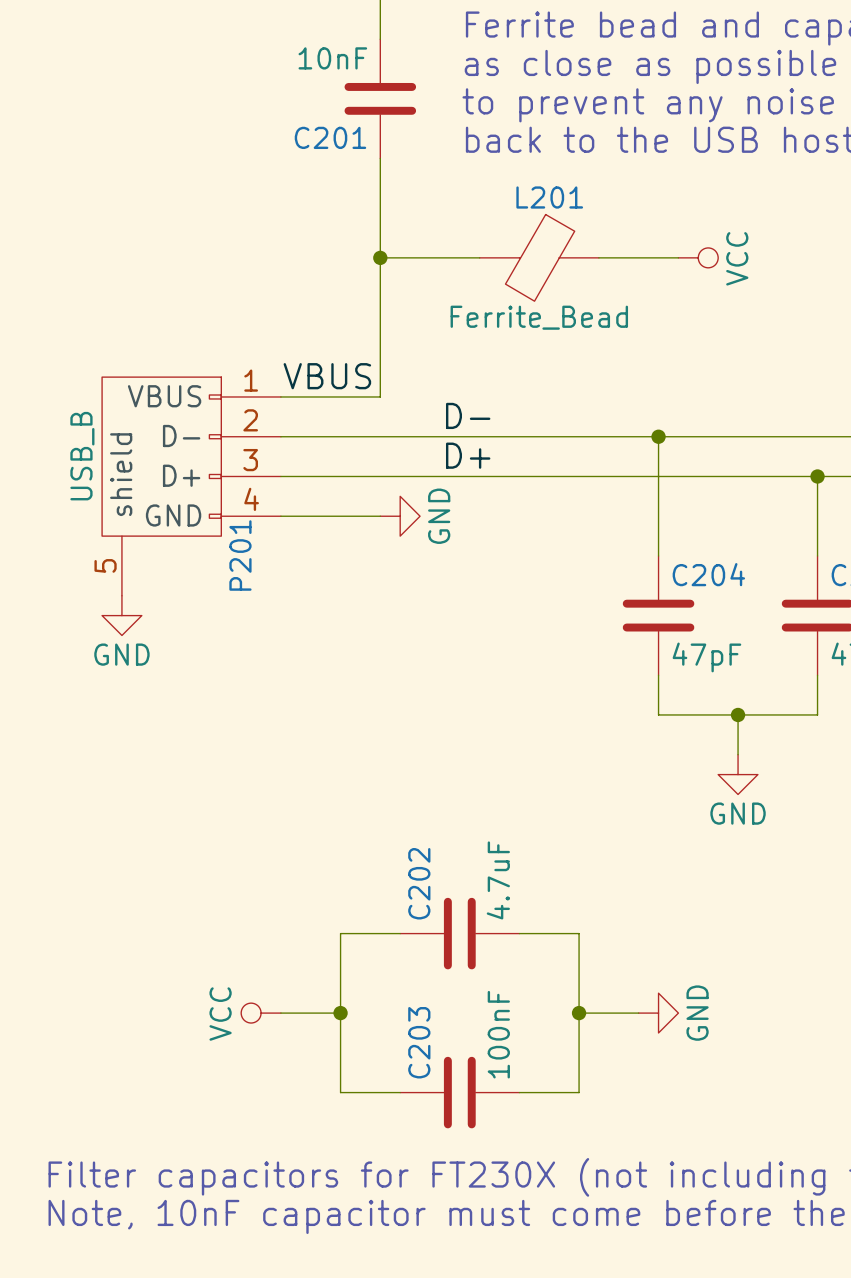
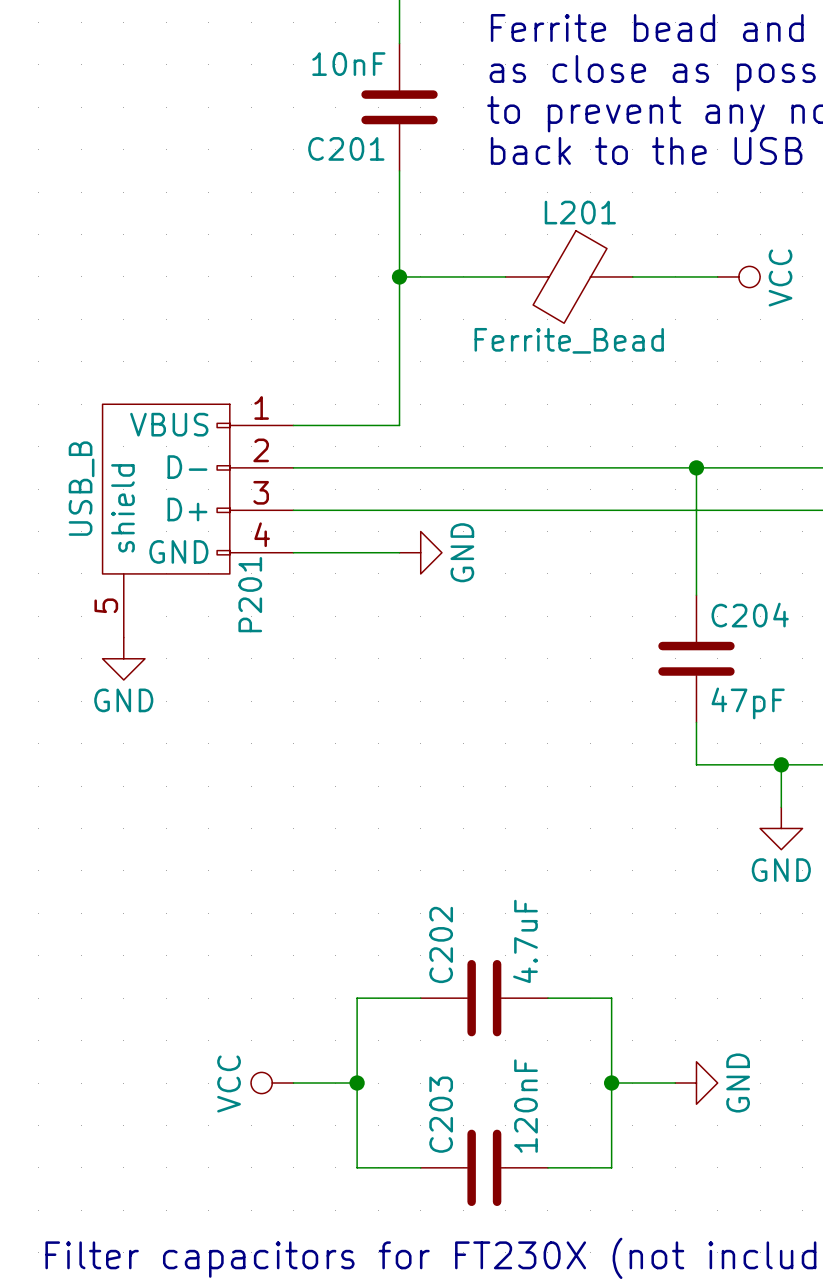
label: VBUS (327, 376) -> none
label: D- (468, 415) -> none
label: D+ (468, 455) -> none
C203 value: 100nF (498, 1034) -> 120nF (525, 1106)

